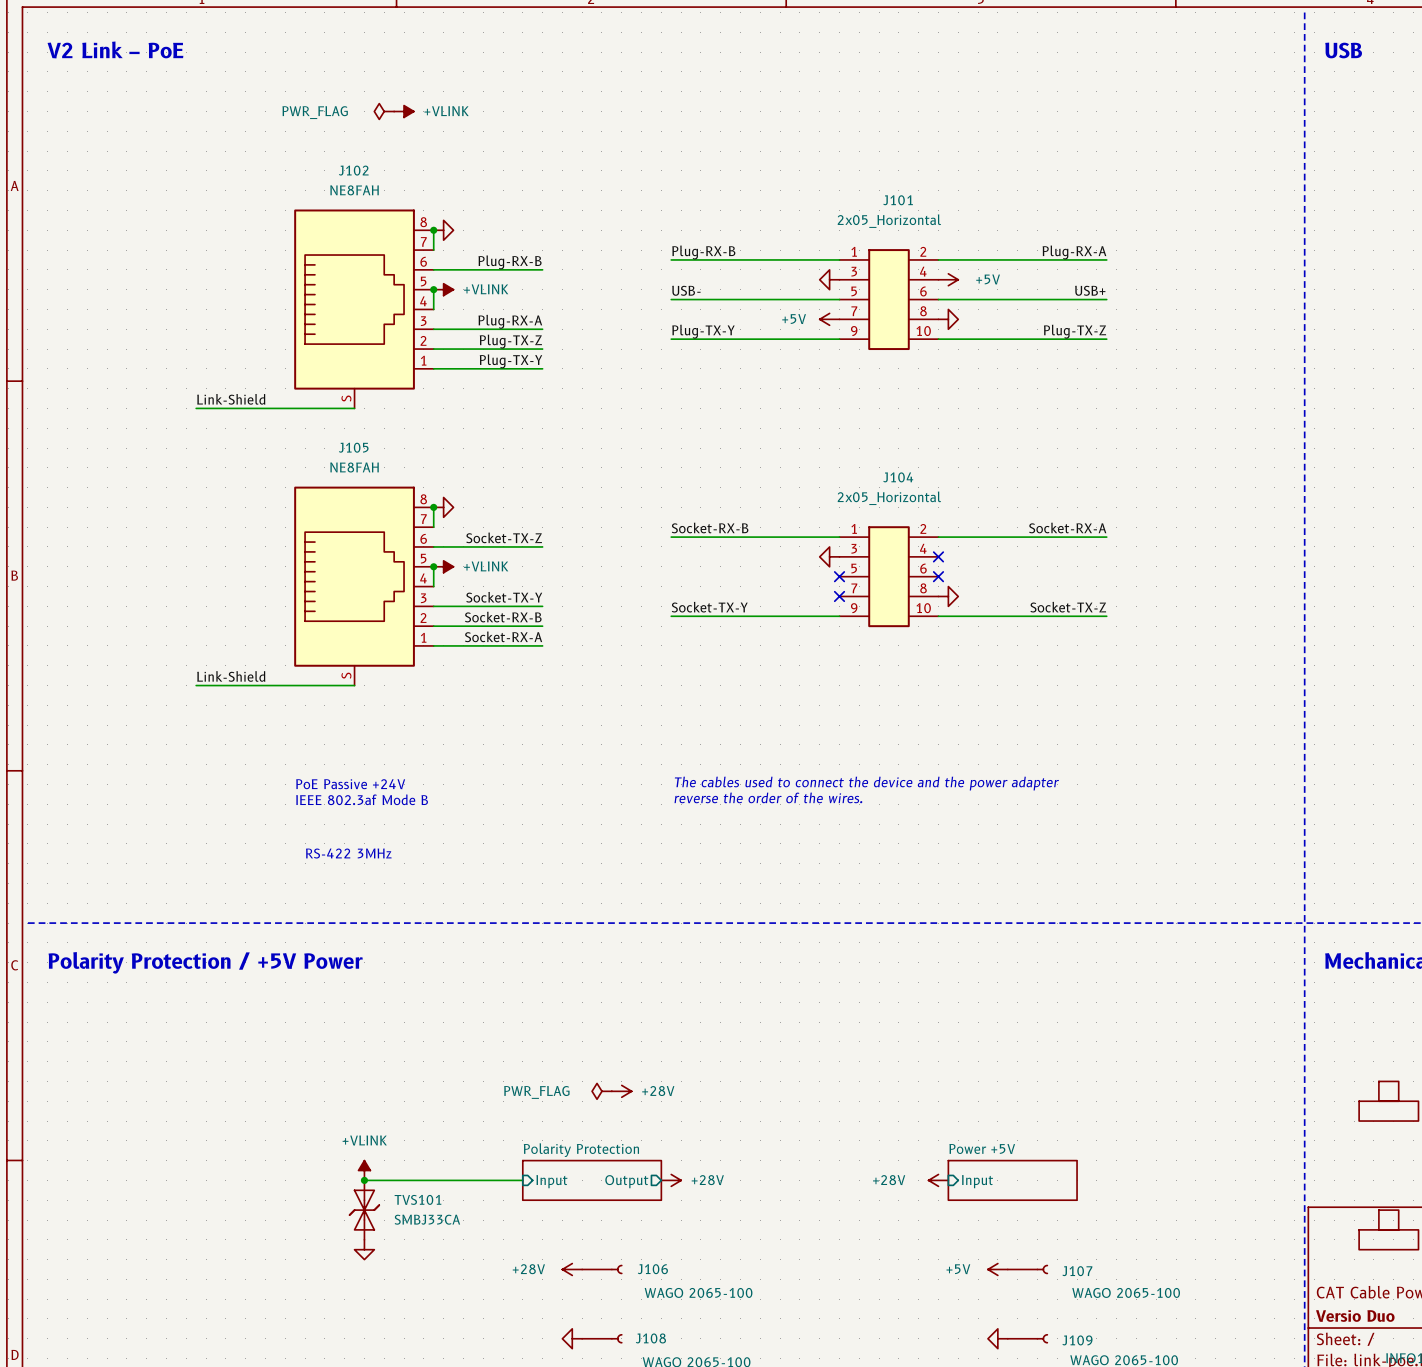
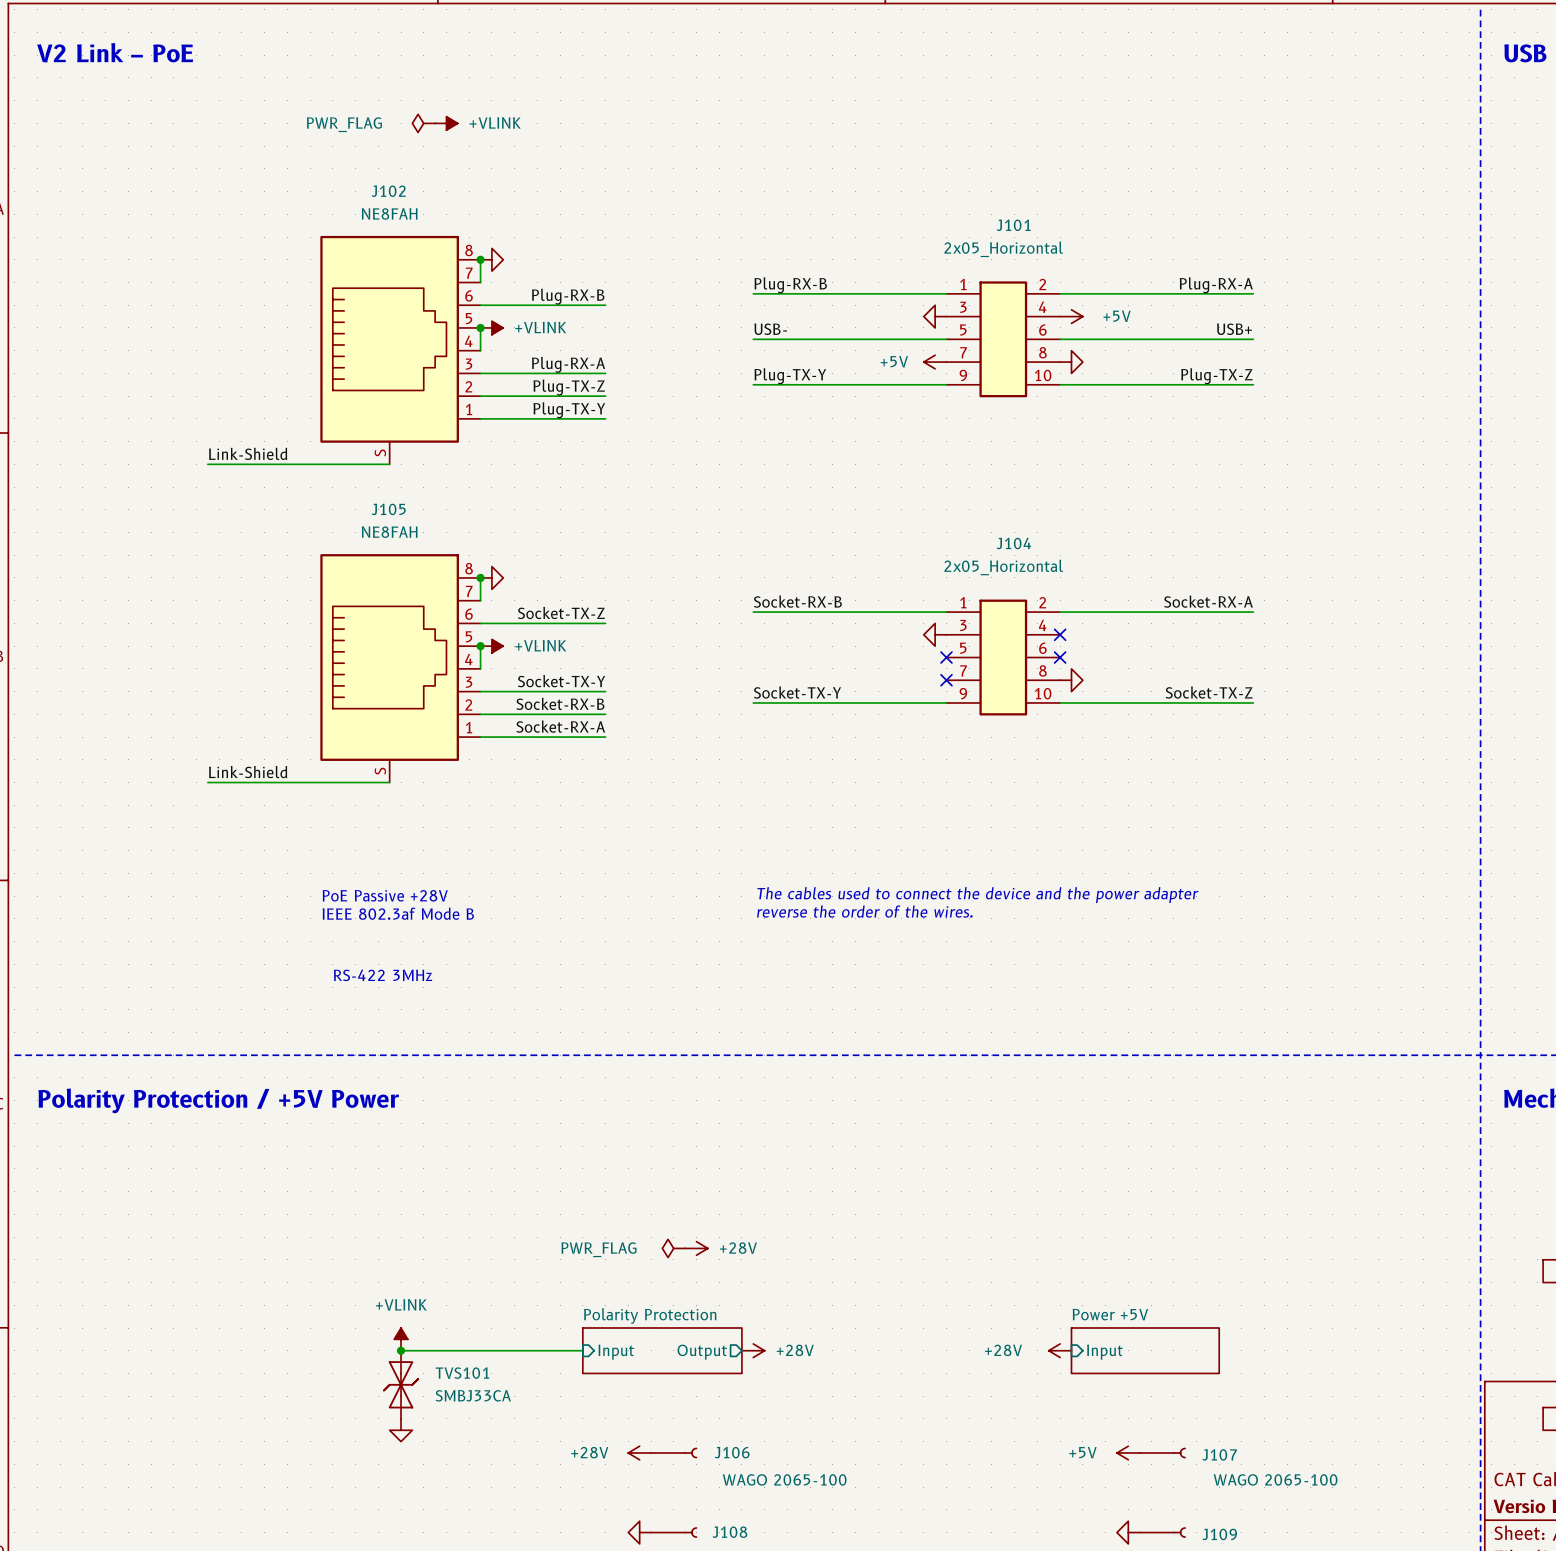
text: PoE Passive +24V (350, 784) -> PoE Passive +28V (385, 895)

